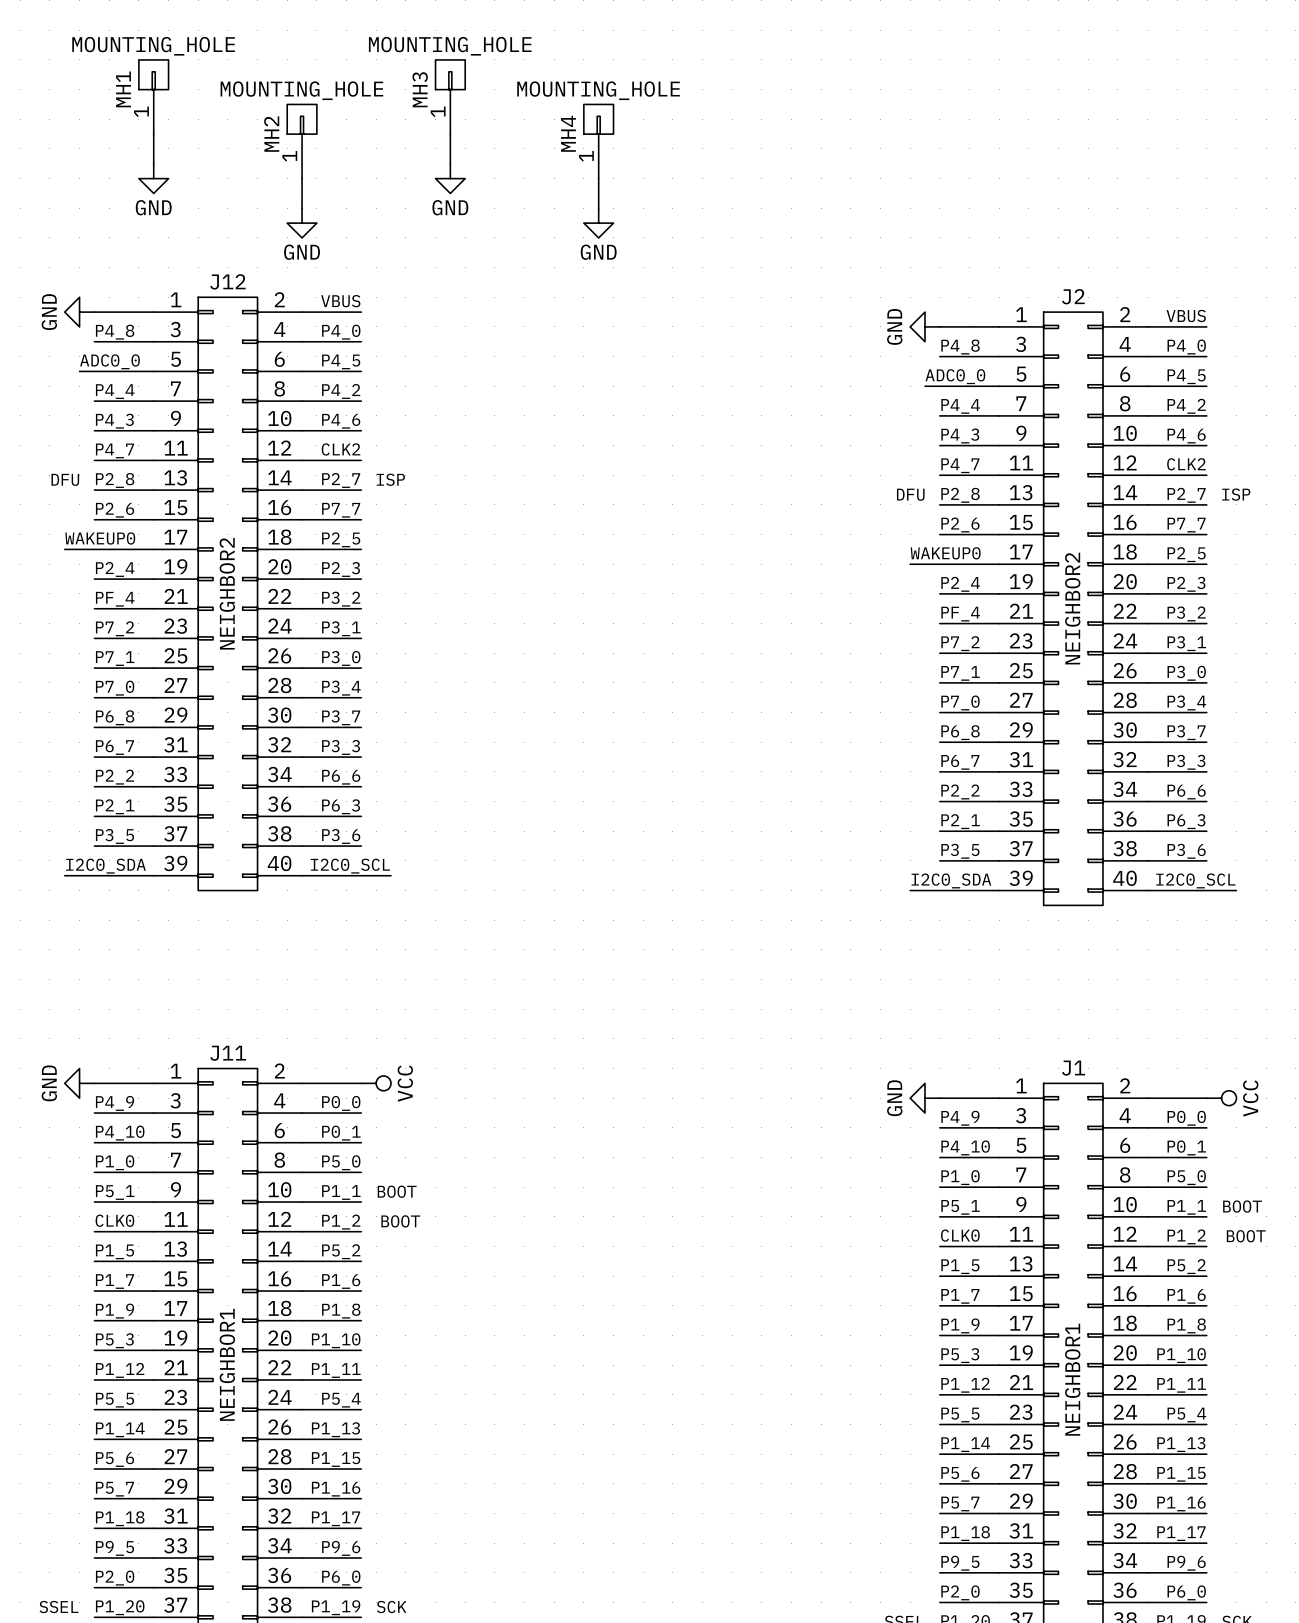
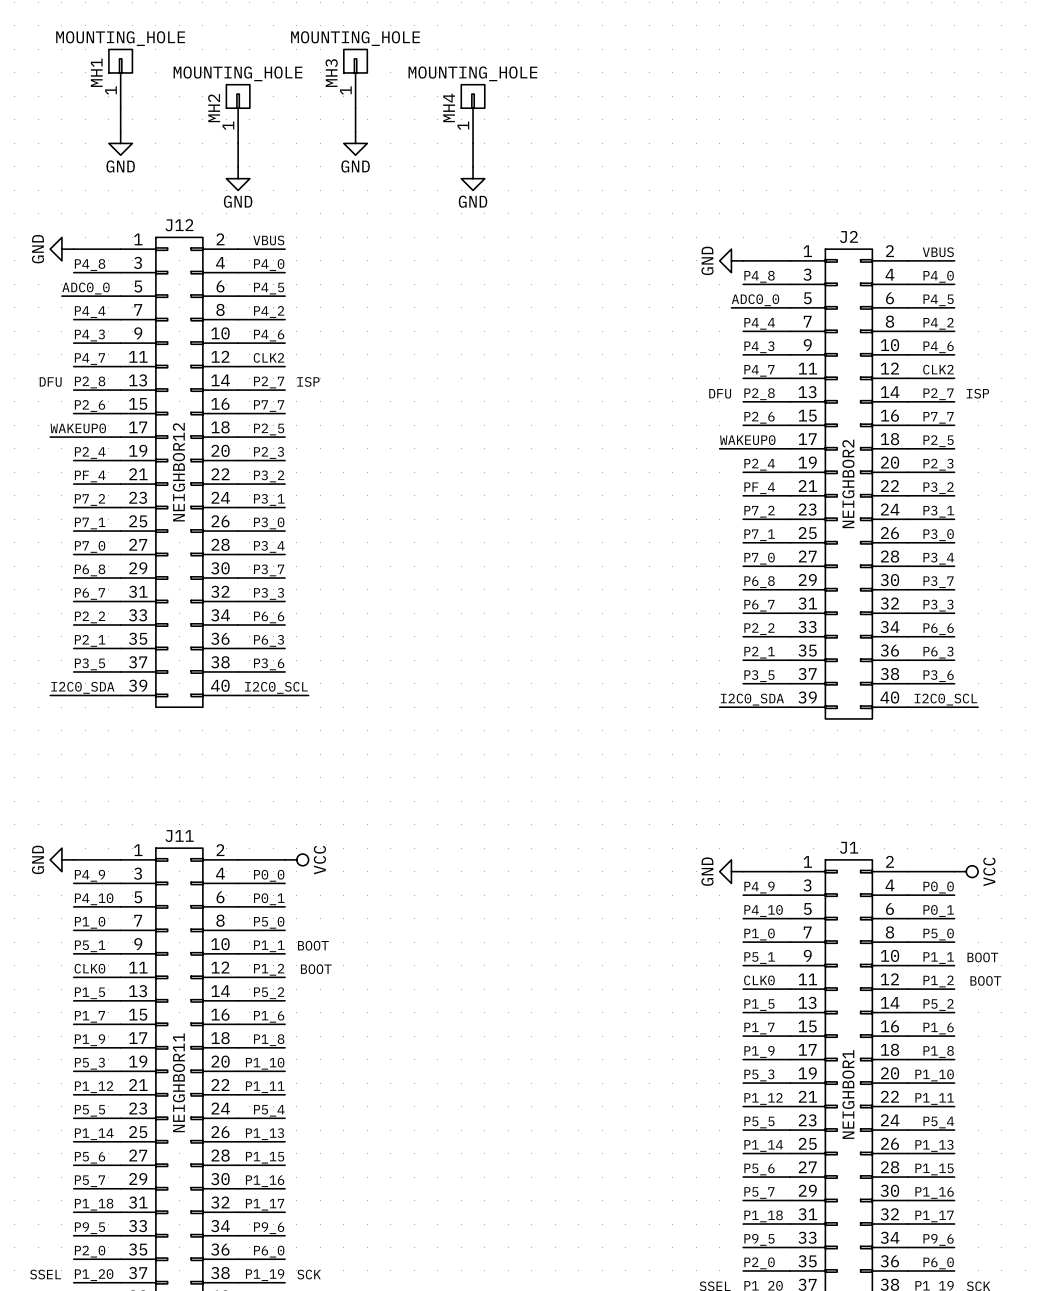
J12 value: NEIGHBOR2 (227, 593) -> NEIGHBOR12 (178, 472)
J11 value: NEIGHBOR1 (227, 1364) -> NEIGHBOR11 (178, 1082)

